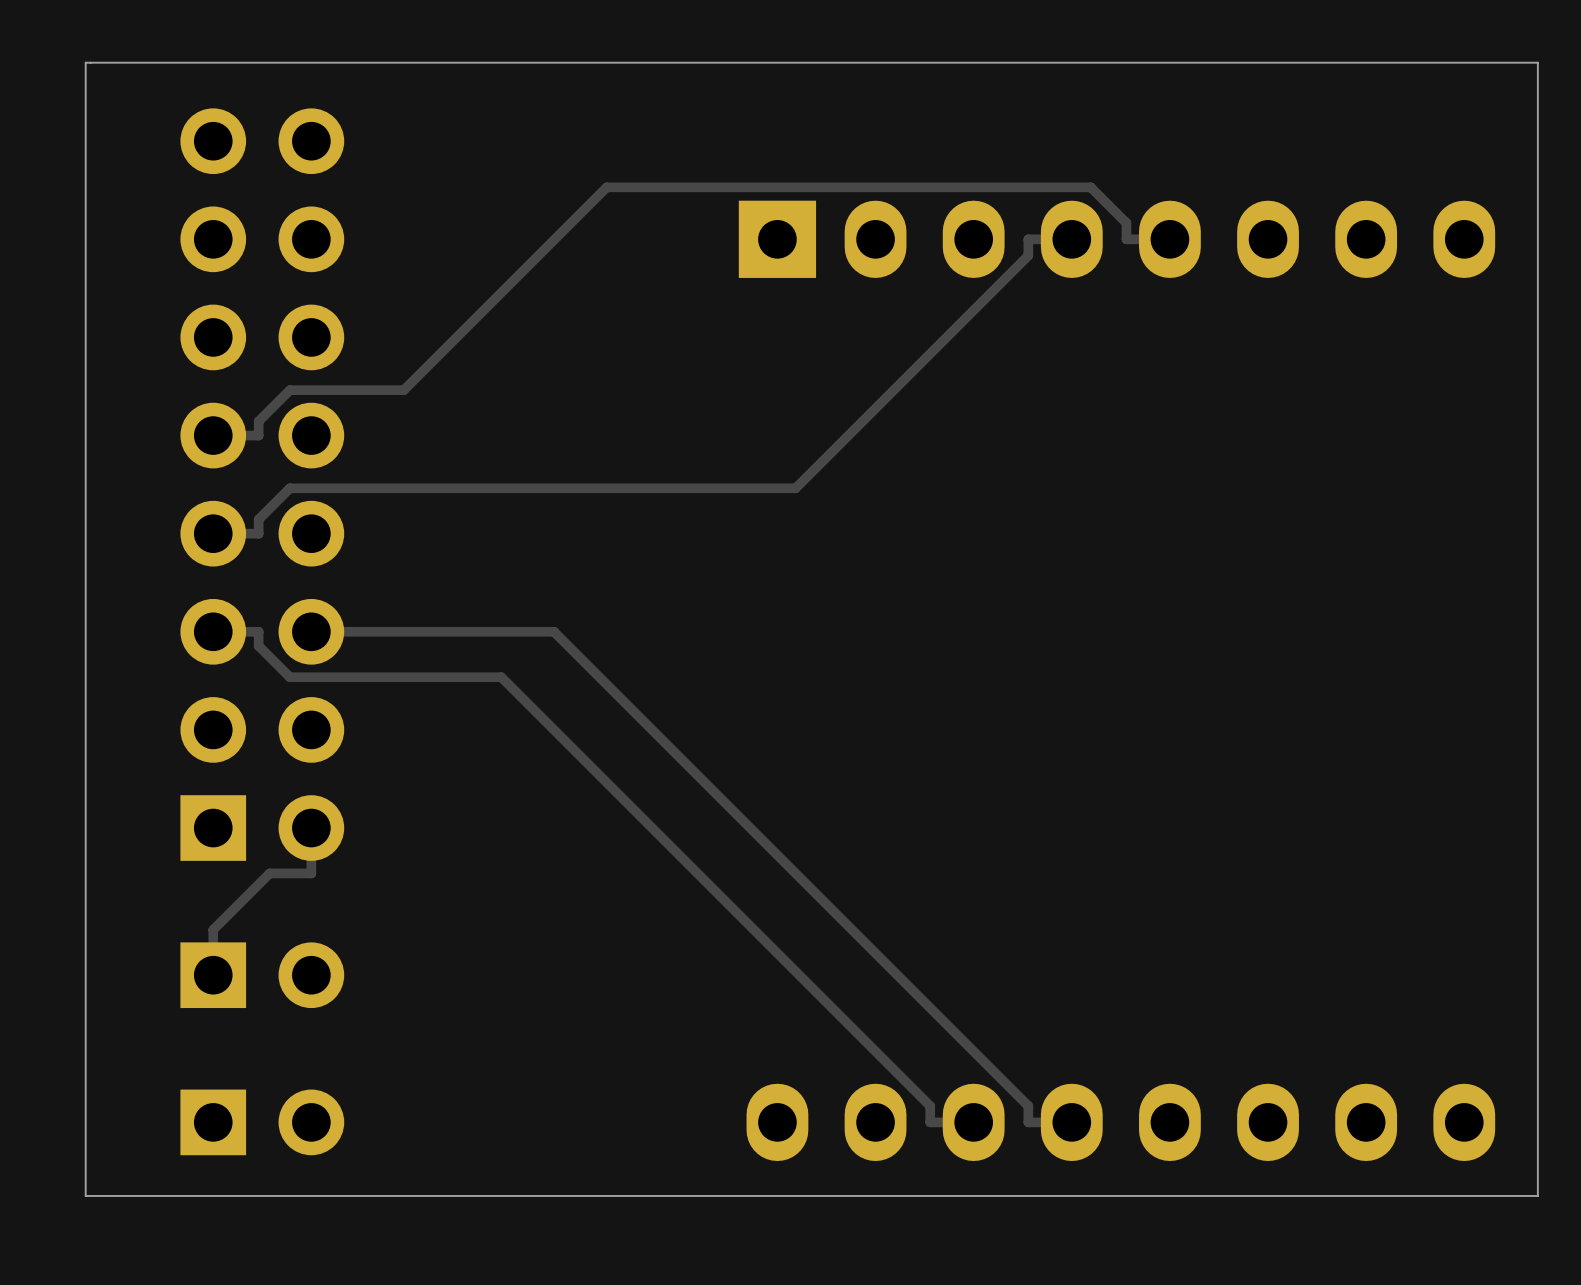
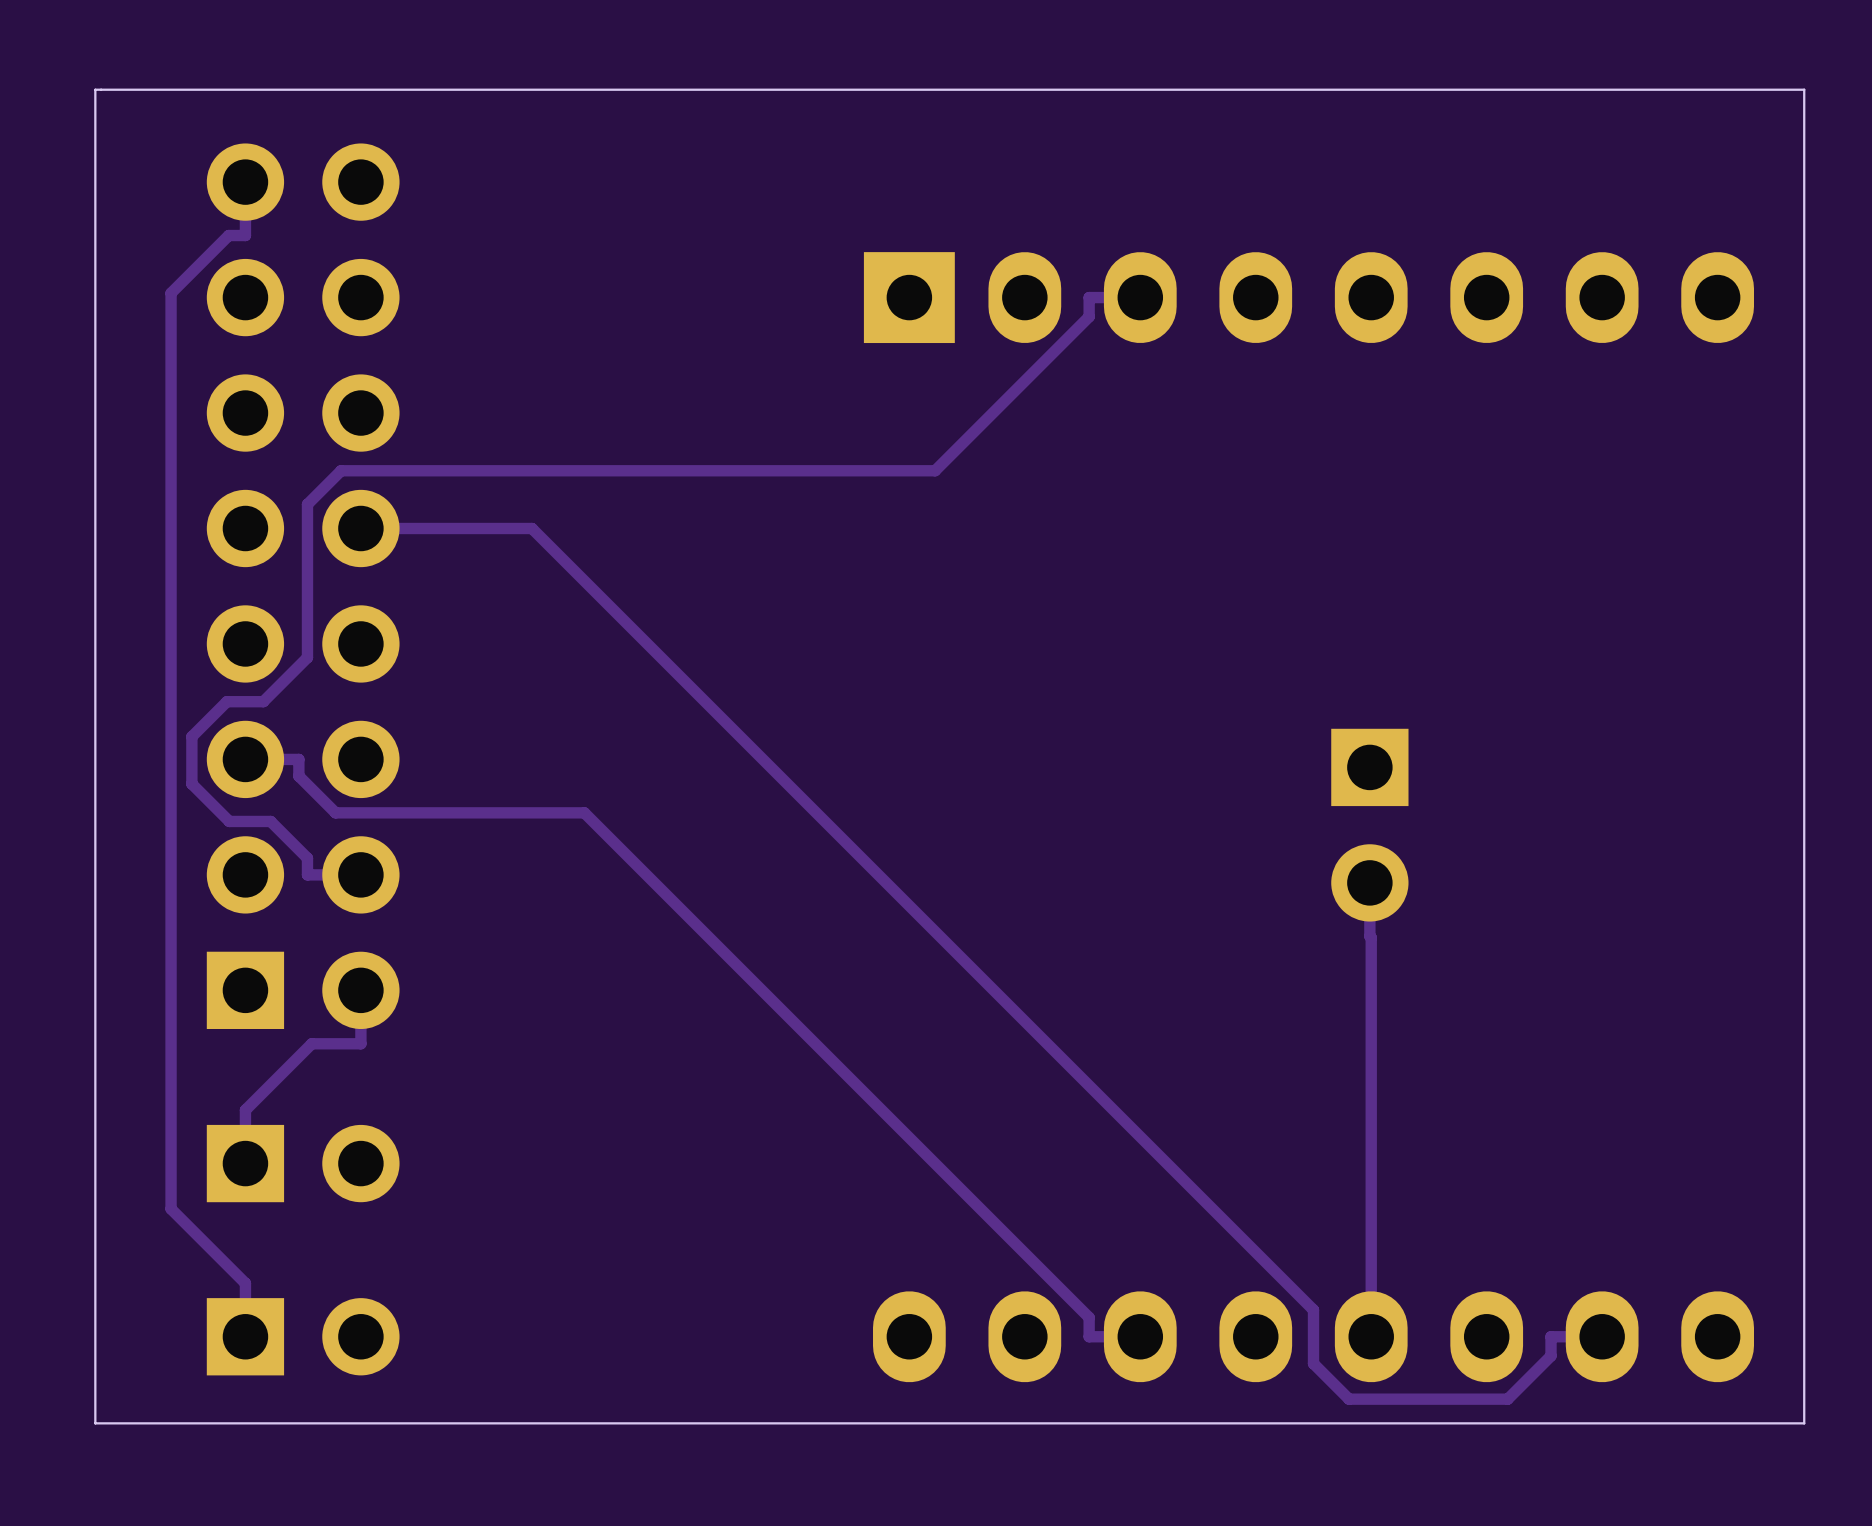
track: none -> (245, 182) (245, 235) (228, 235) (171, 293) (171, 1208) (245, 1283) (245, 1336)
track: none -> (1140, 297) (1089, 297) (1089, 316) (935, 470) (341, 470) (307, 504) (307, 657) (263, 701) (226, 701) (191, 736) (191, 783) (229, 821) (270, 821) (307, 858) (307, 874) (360, 874)
track: (1071, 239) (1028, 239) (1028, 255) (795, 488) (289, 488) (258, 519) (258, 533) (213, 533) -> none
track: (1169, 239) (1126, 239) (1126, 223) (1090, 187) (606, 187) (403, 390) (289, 390) (258, 421) (258, 435) (213, 435) -> none
track: none -> (360, 528) (532, 528) (1313, 1310) (1313, 1363) (1349, 1399) (1507, 1399) (1551, 1355) (1551, 1336) (1602, 1336)
track: (311, 631) (554, 631) (1028, 1106) (1028, 1122) (1071, 1122) -> none
part: none -> (1369, 825)
track: none -> (1369, 882) (1371, 1336)

